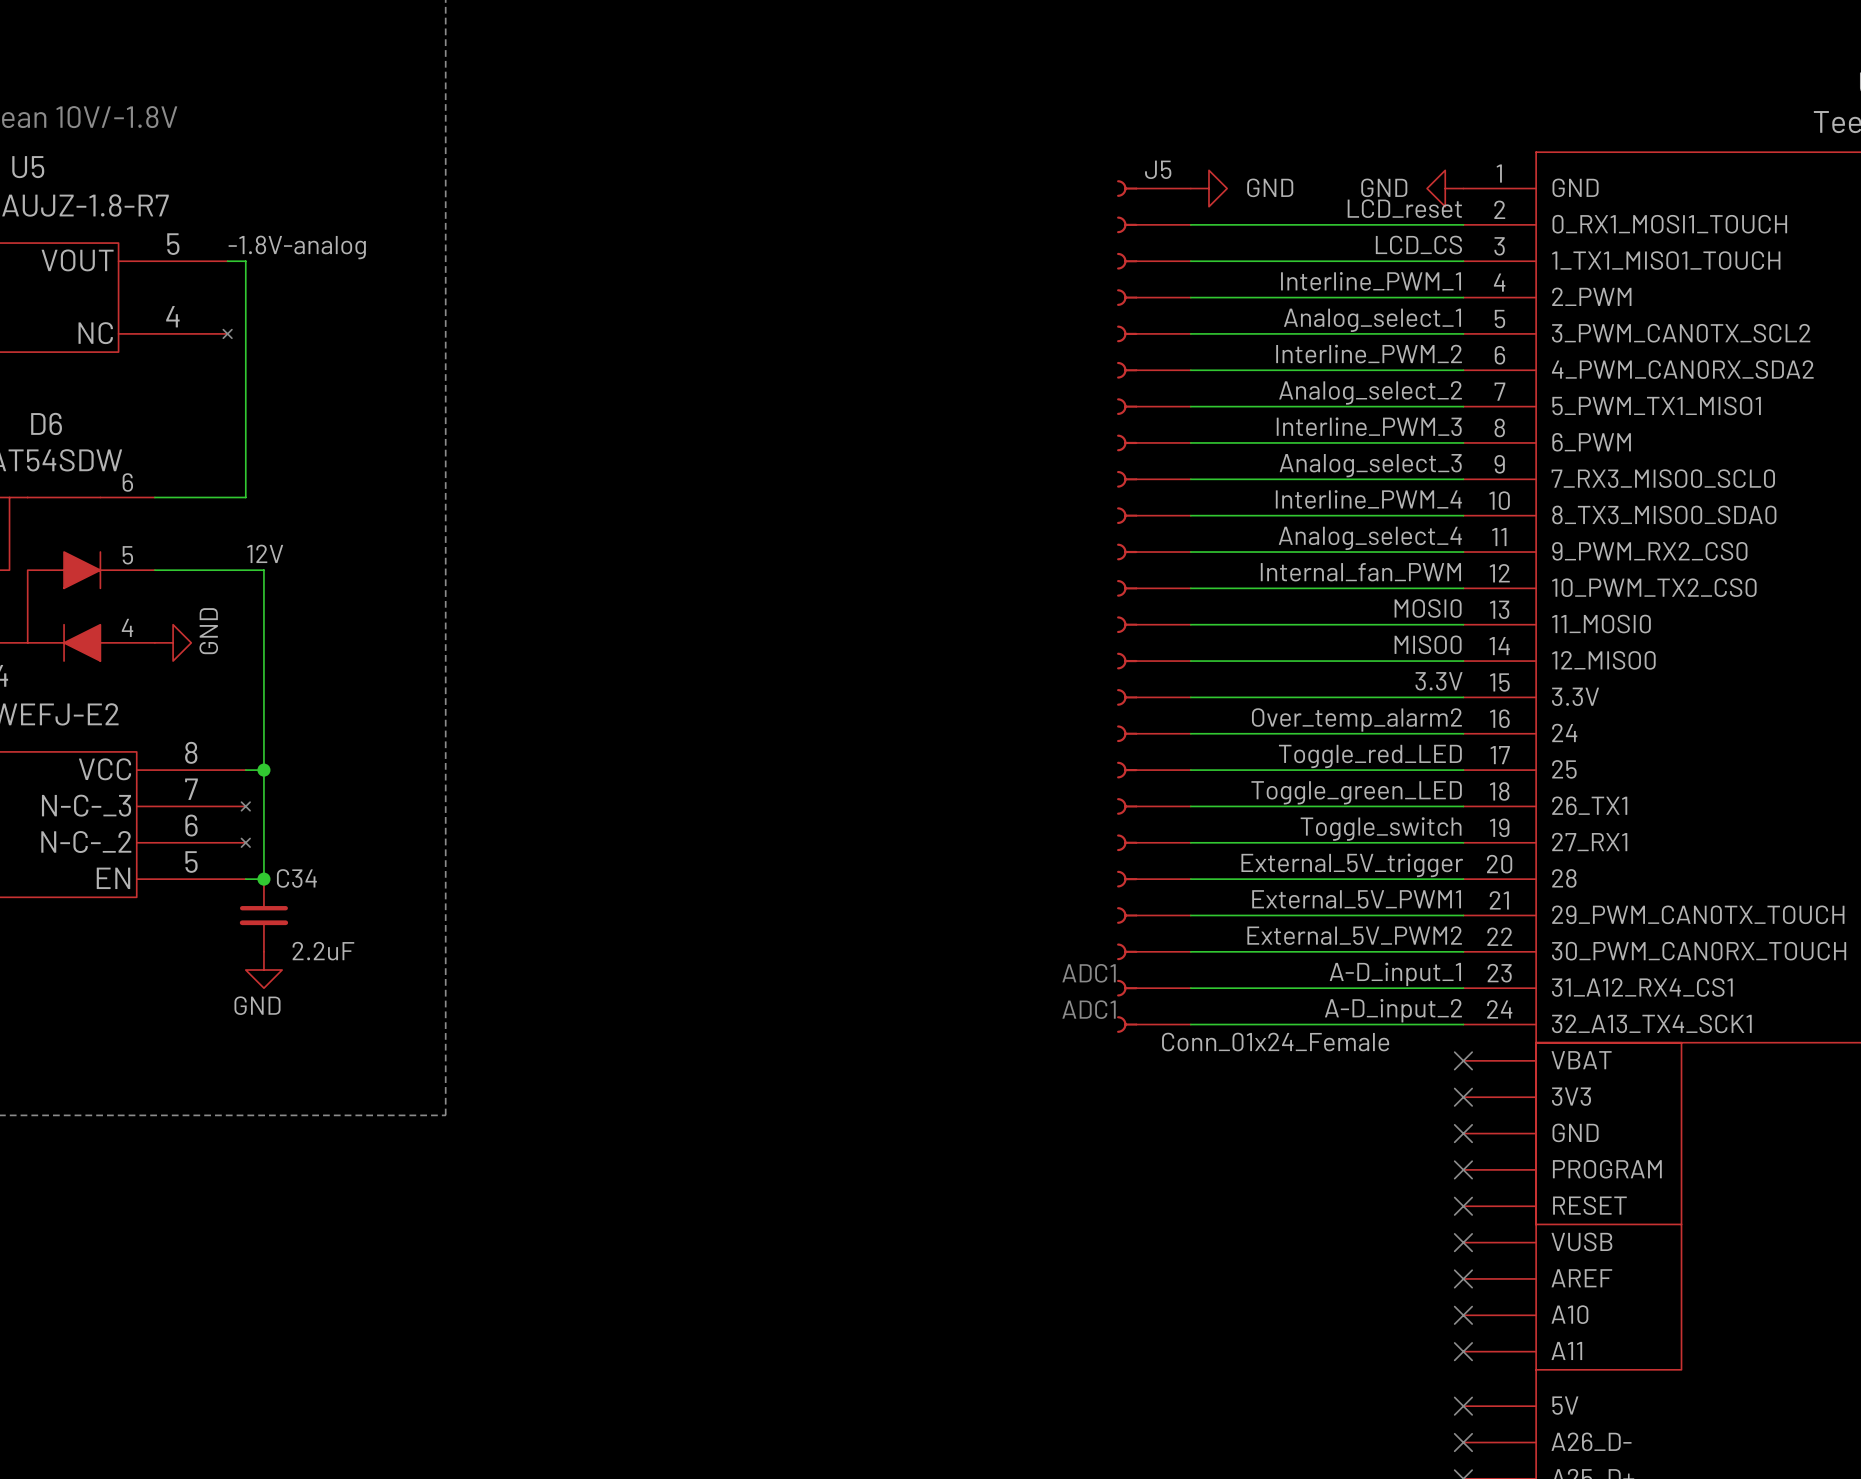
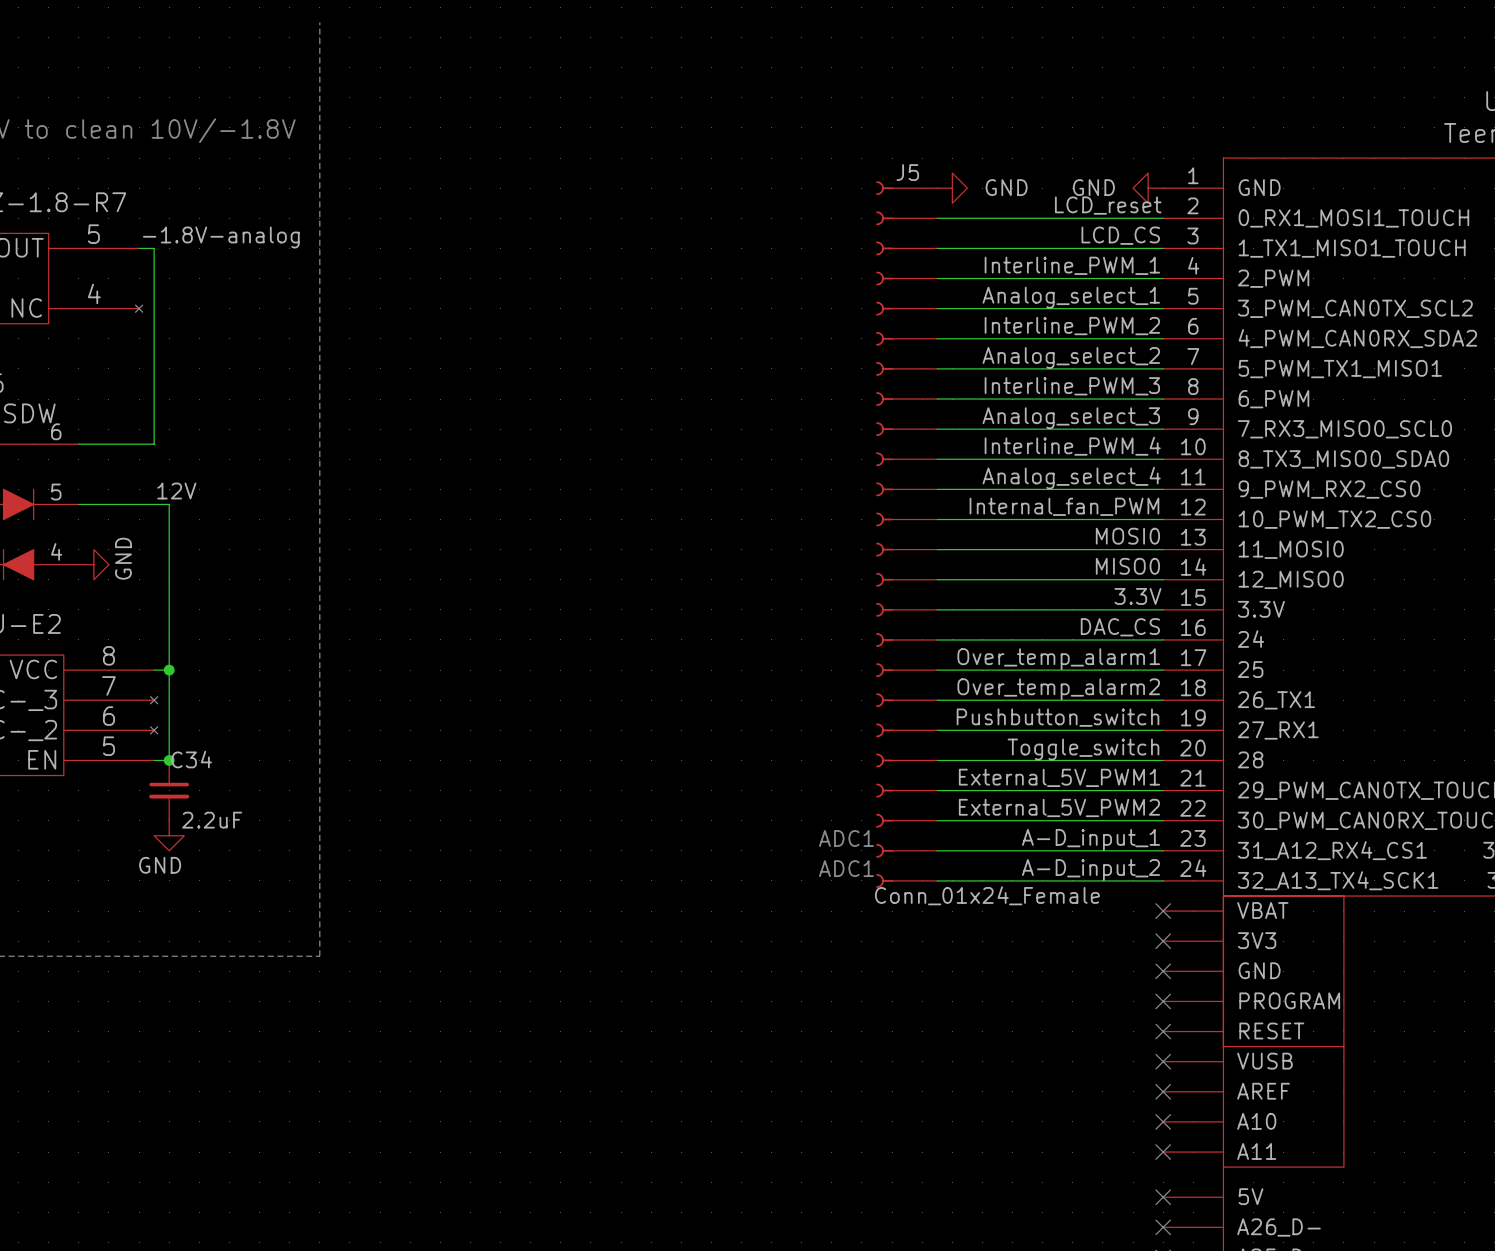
label: Over_temp_alarm2 (1356, 719) -> DAC_CS (1120, 627)
label: Toggle_red_LED (1370, 756) -> Over_temp_alarm1 (1058, 659)
label: Toggle_green_LED (1356, 792) -> Over_temp_alarm2 (1058, 689)
label: Toggle_switch (1381, 829) -> Pushbutton_switch (1058, 717)
label: External_5V_trigger (1352, 865) -> Toggle_switch (1083, 749)

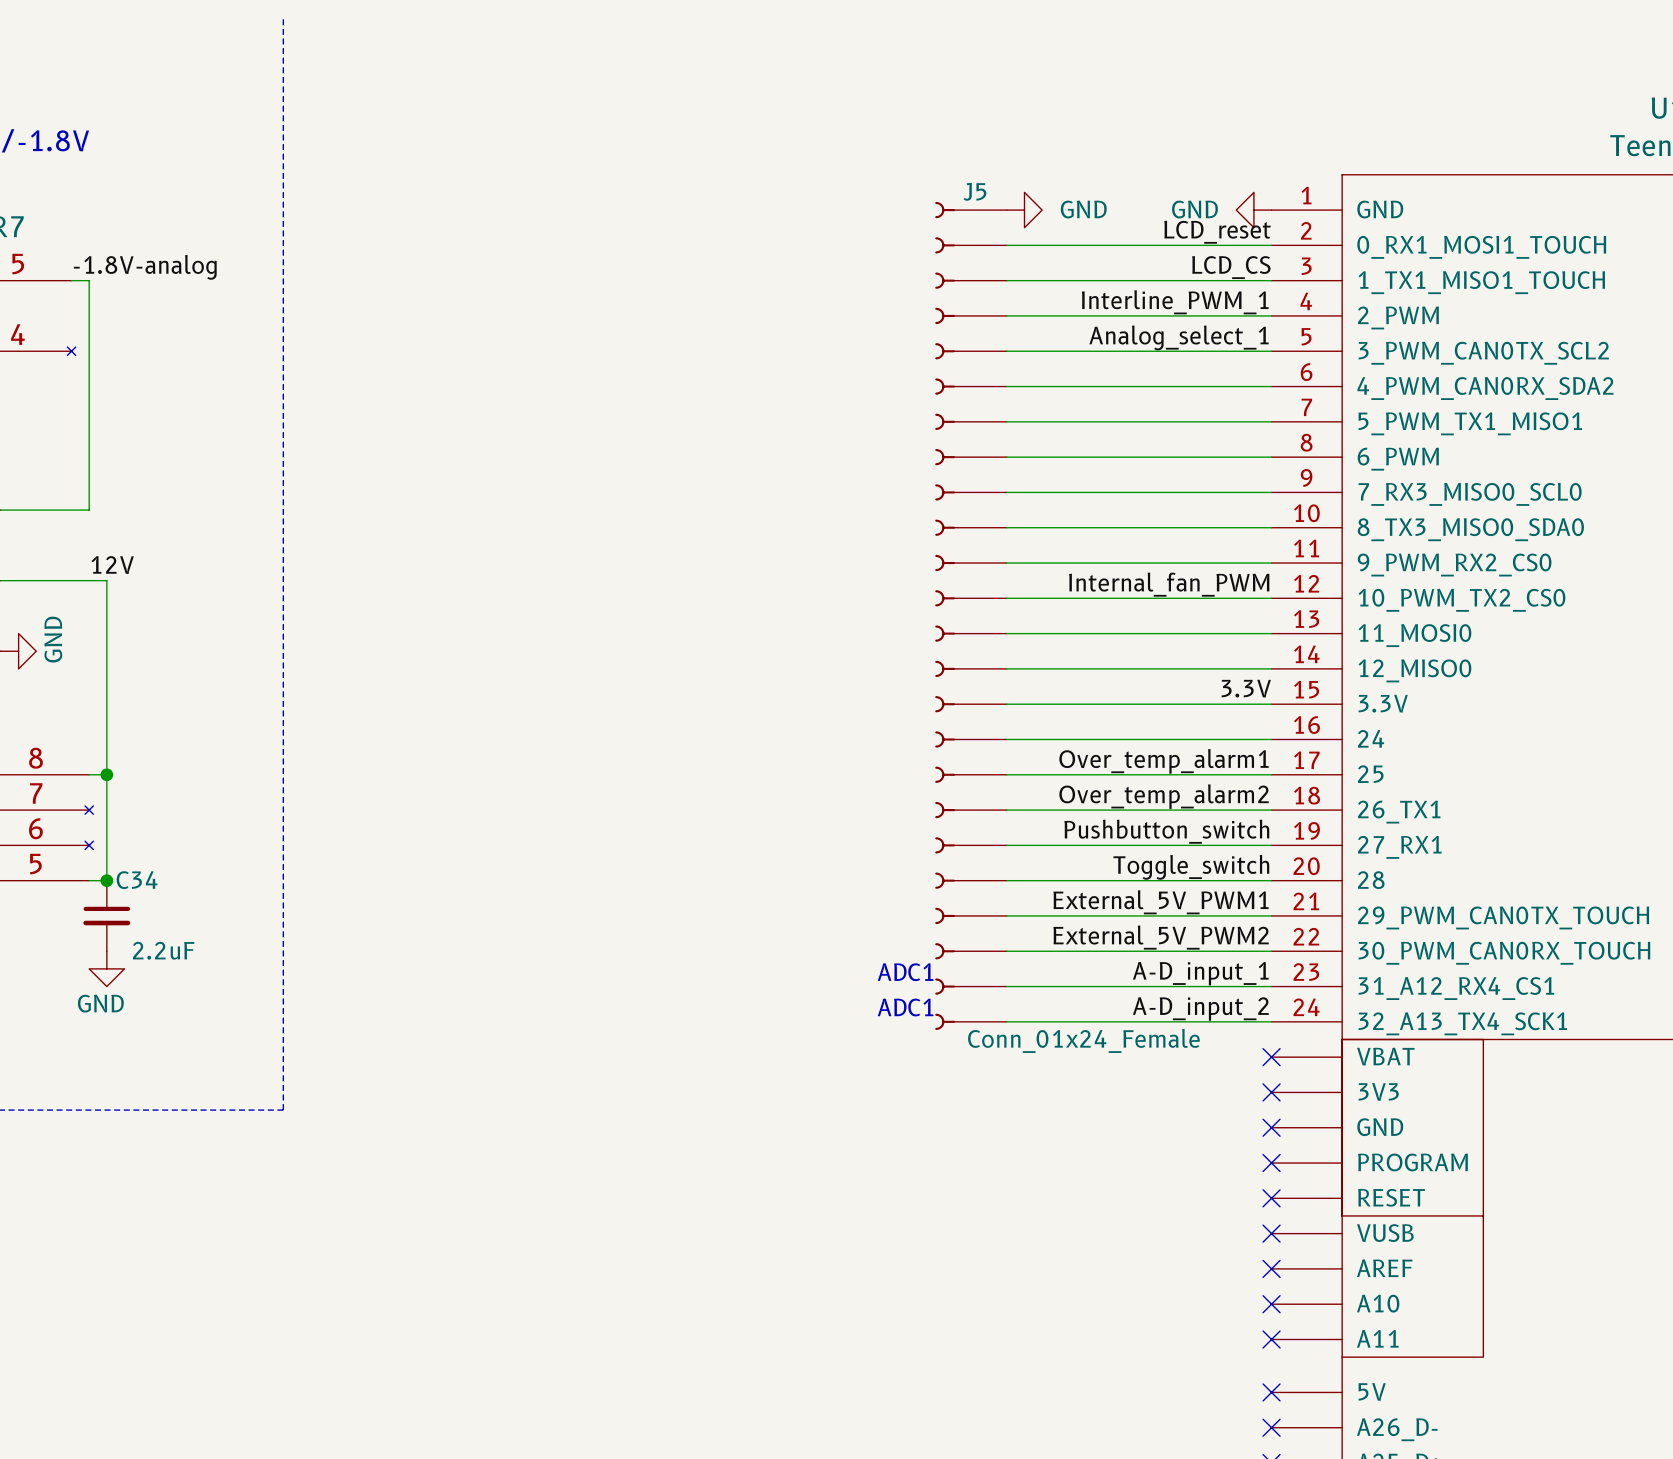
label: Interline_PWM_2 (1072, 326) -> none
label: Analog_select_2 (1071, 357) -> none
label: Interline_PWM_3 (1072, 386) -> none
label: Analog_select_3 (1071, 418) -> none
label: Interline_PWM_4 (1072, 446) -> none
label: Analog_select_4 (1071, 478) -> none
label: MOSI0 (1127, 536) -> none
label: MISO0 (1127, 566) -> none
label: DAC_CS (1120, 627) -> none

